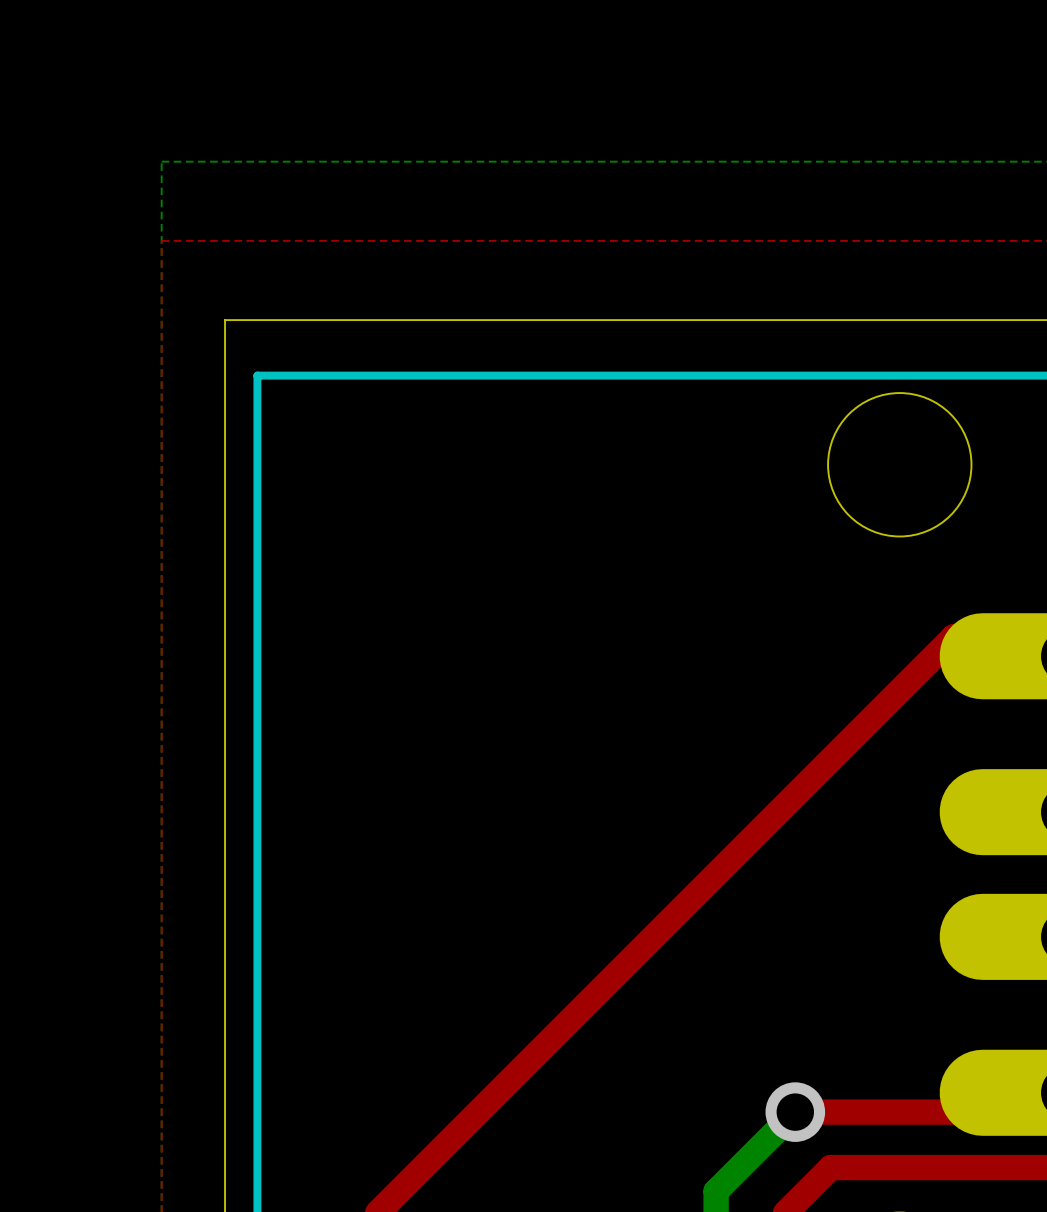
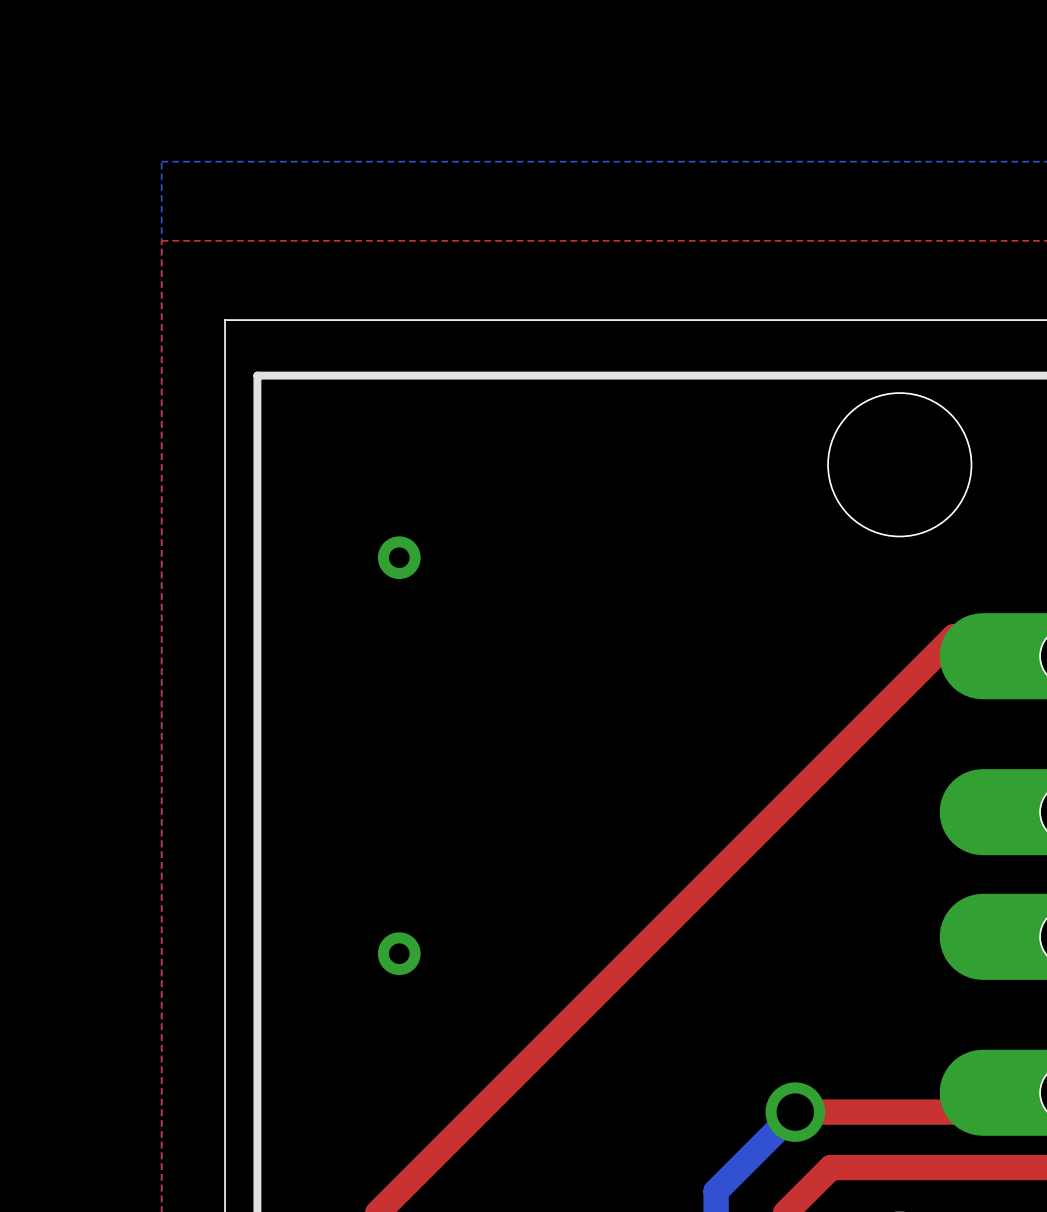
via: none -> (399, 557)
via: none -> (399, 953)

